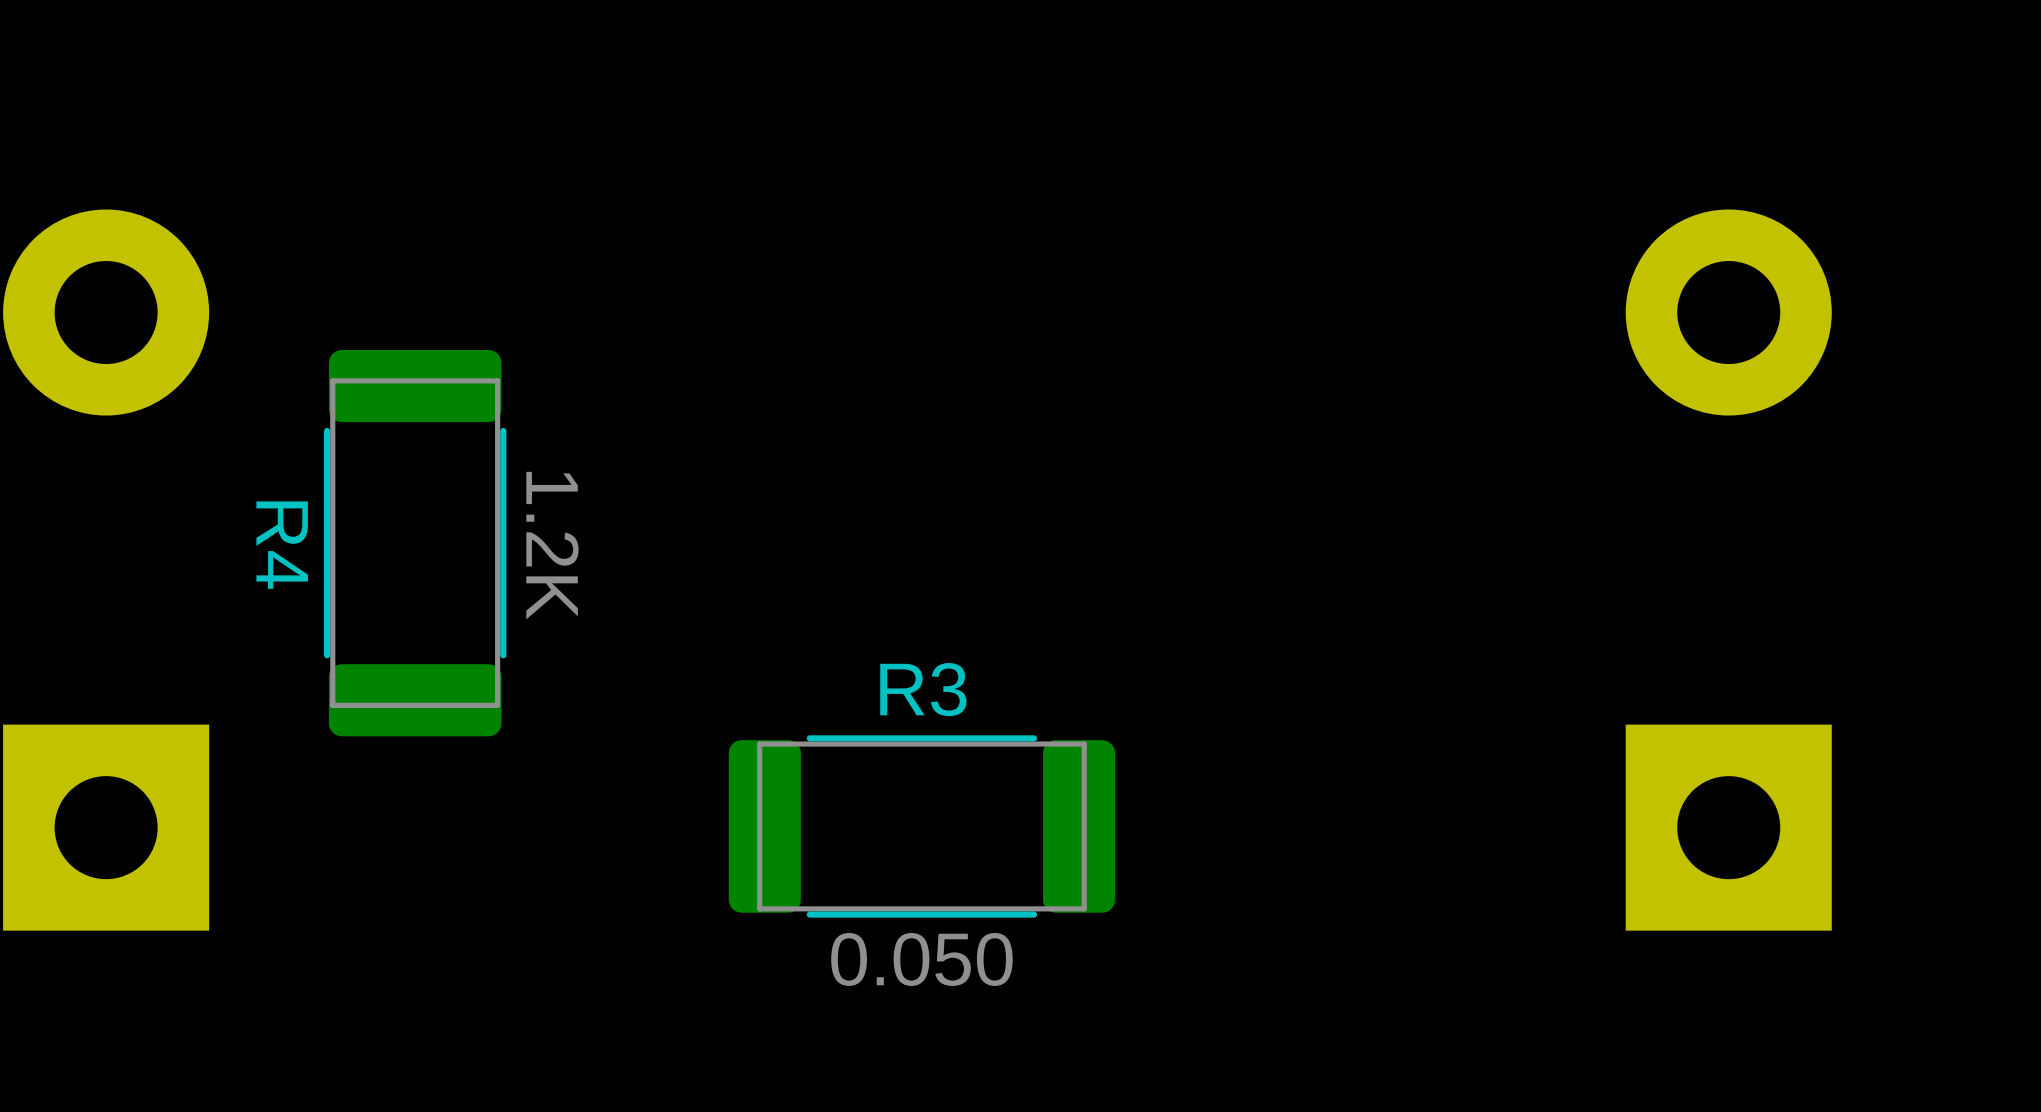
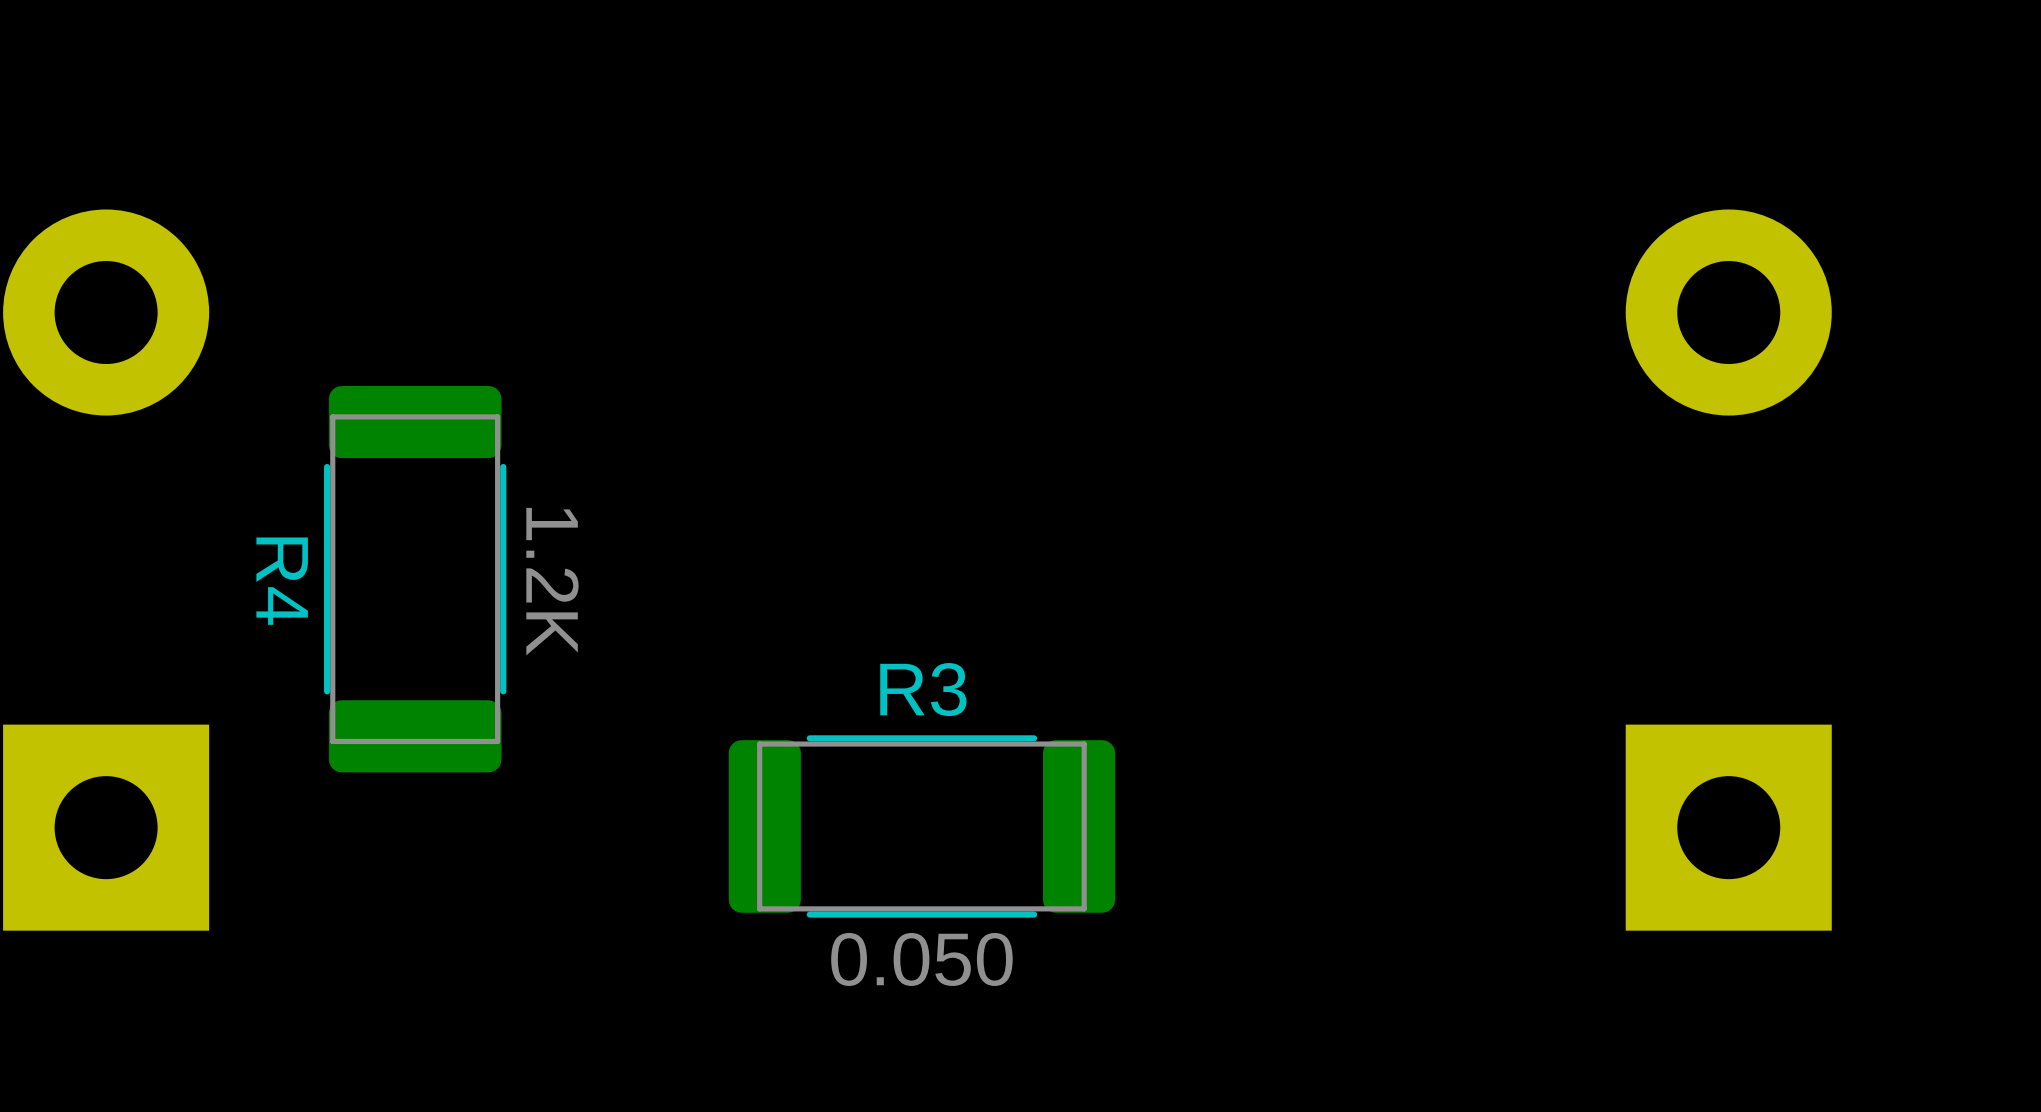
R4 position: (415, 543) -> (415, 579)

